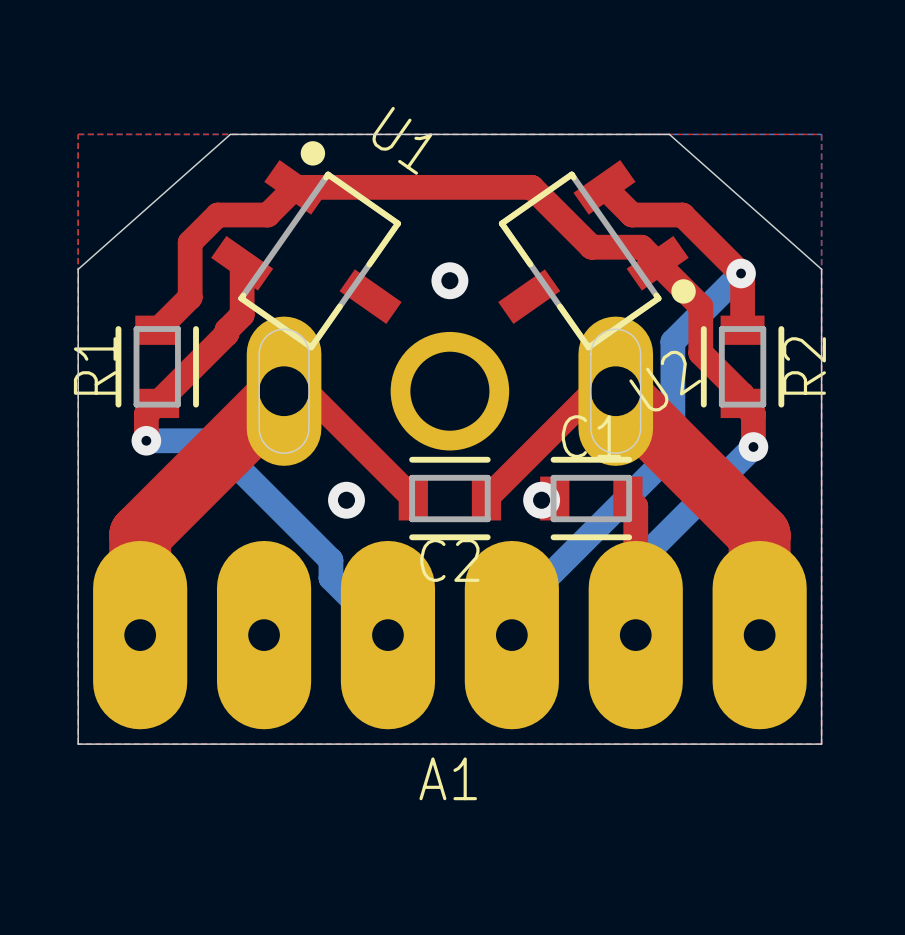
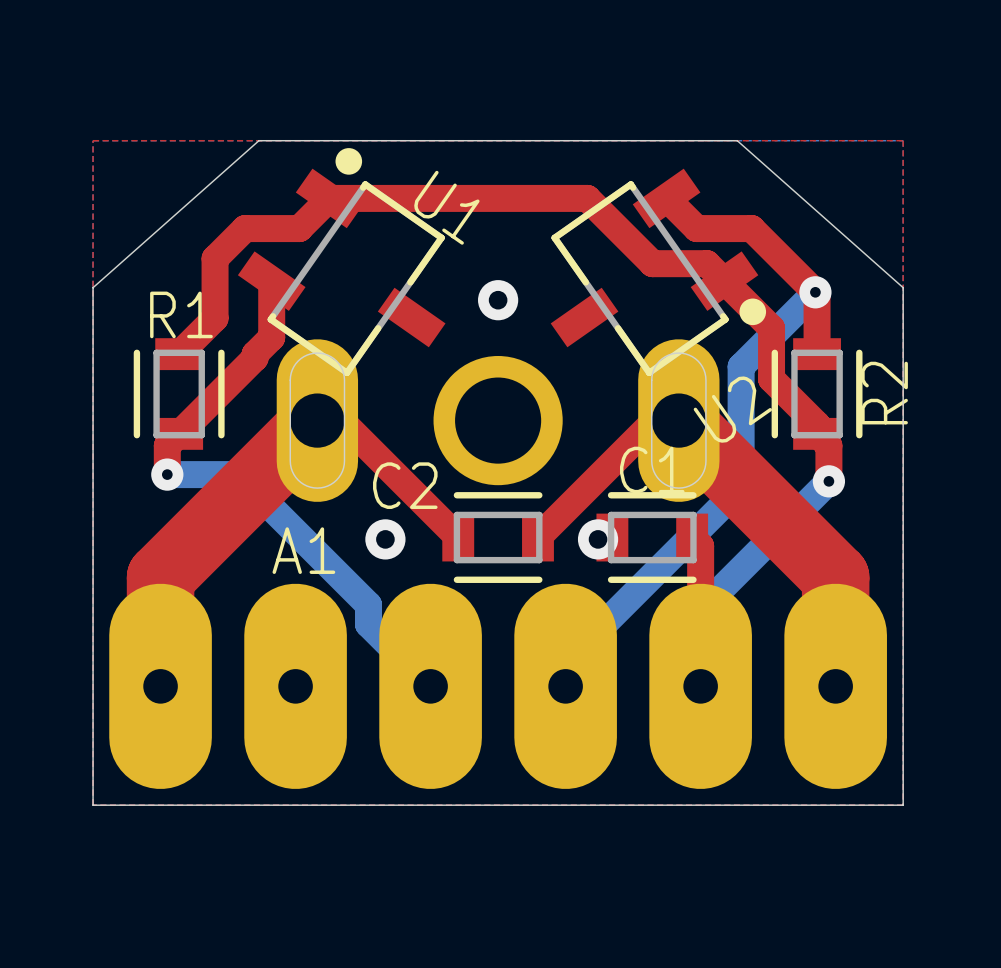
U1 name position: U1 (402, 140) -> U1 (446, 207)
R1 name rotation: 0° (95, 365) -> 90° clockwise (181, 314)
R1 name position: R1 (95, 365) -> R1 (181, 314)
C2 name position: C2 (449, 560) -> C2 (405, 485)
A1 name position: A1 (448, 778) -> A1 (303, 550)

